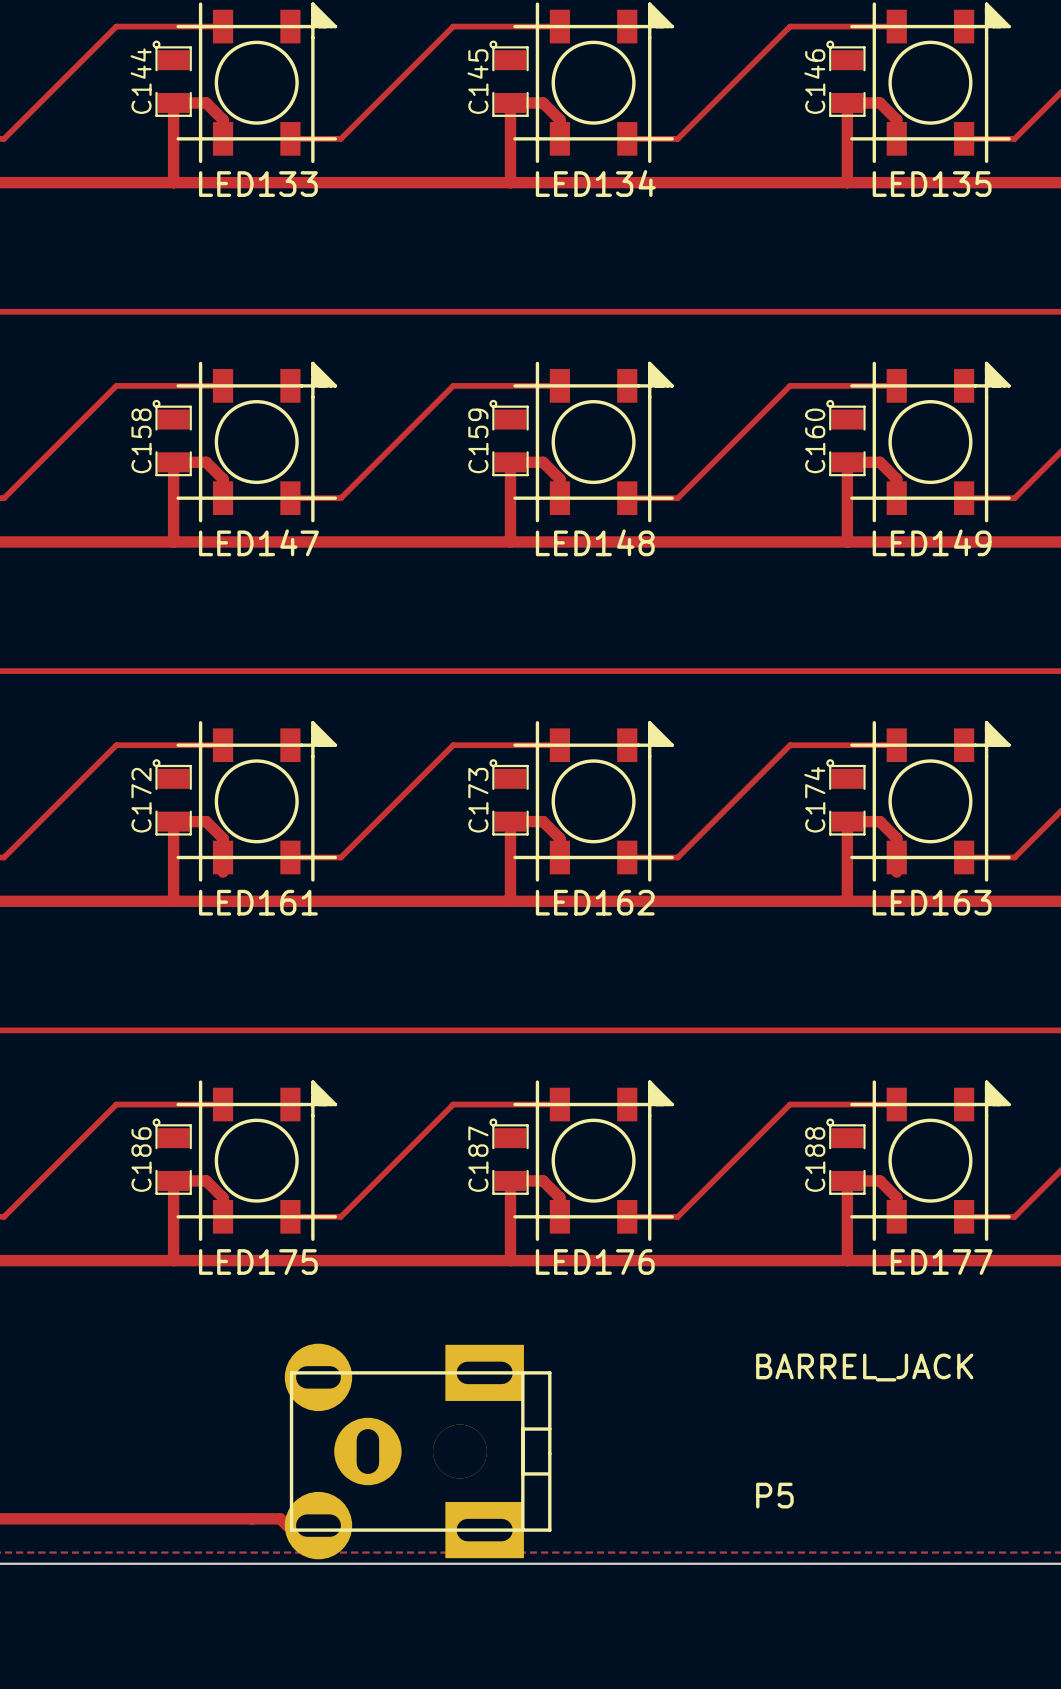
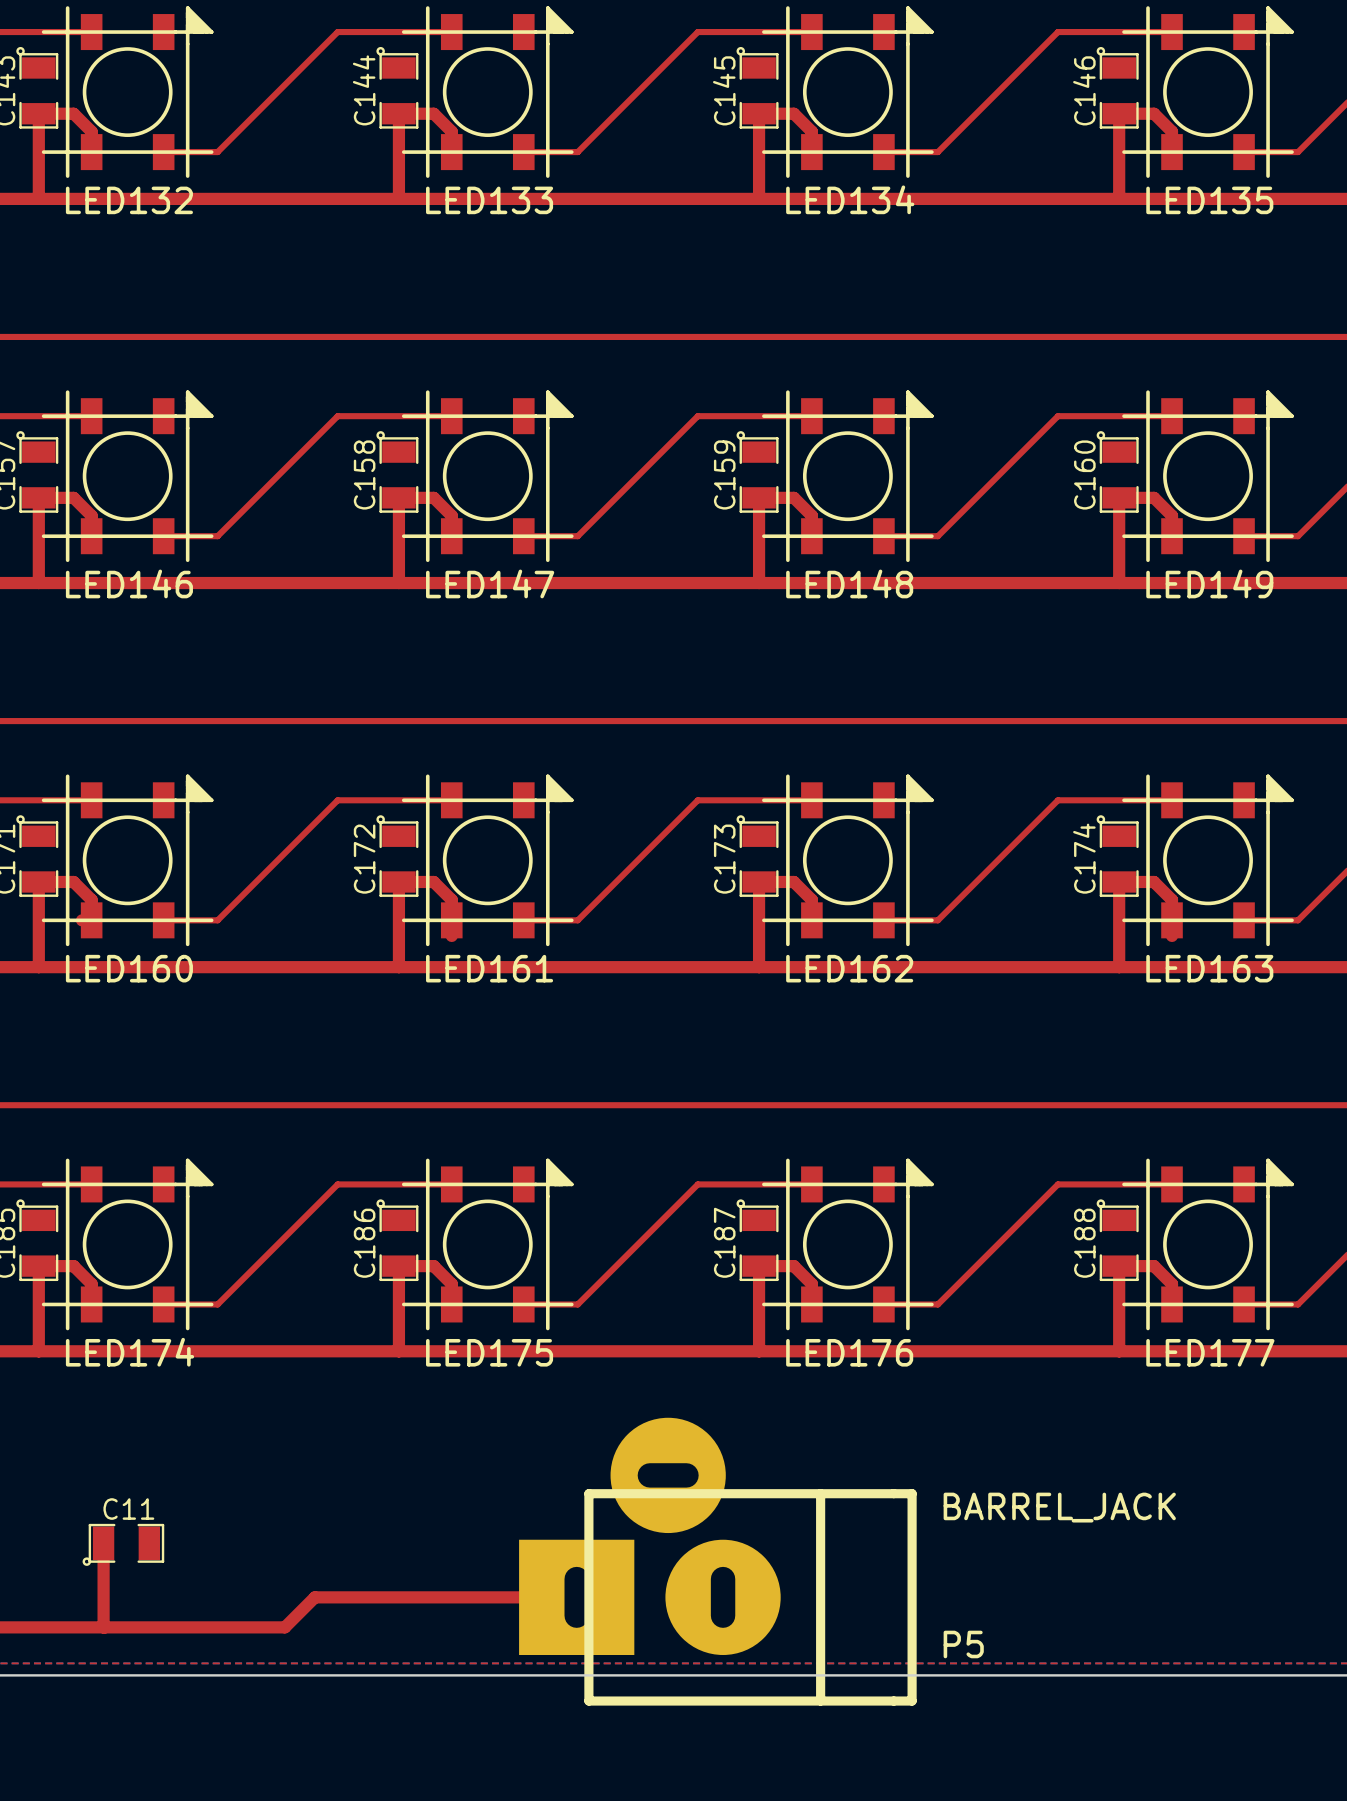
P5 footprint: [284, 1343, 552, 1560] -> [519, 1417, 917, 1706]
P5 value position: BARREL_JACK (864, 1367) -> BARREL_JACK (1059, 1507)
P5 name position: P5 (774, 1495) -> P5 (963, 1644)
top track: (66, 1518) (280, 1518) (287, 1525) (318, 1525) -> (284, 1627) (314, 1597) (576, 1597)

